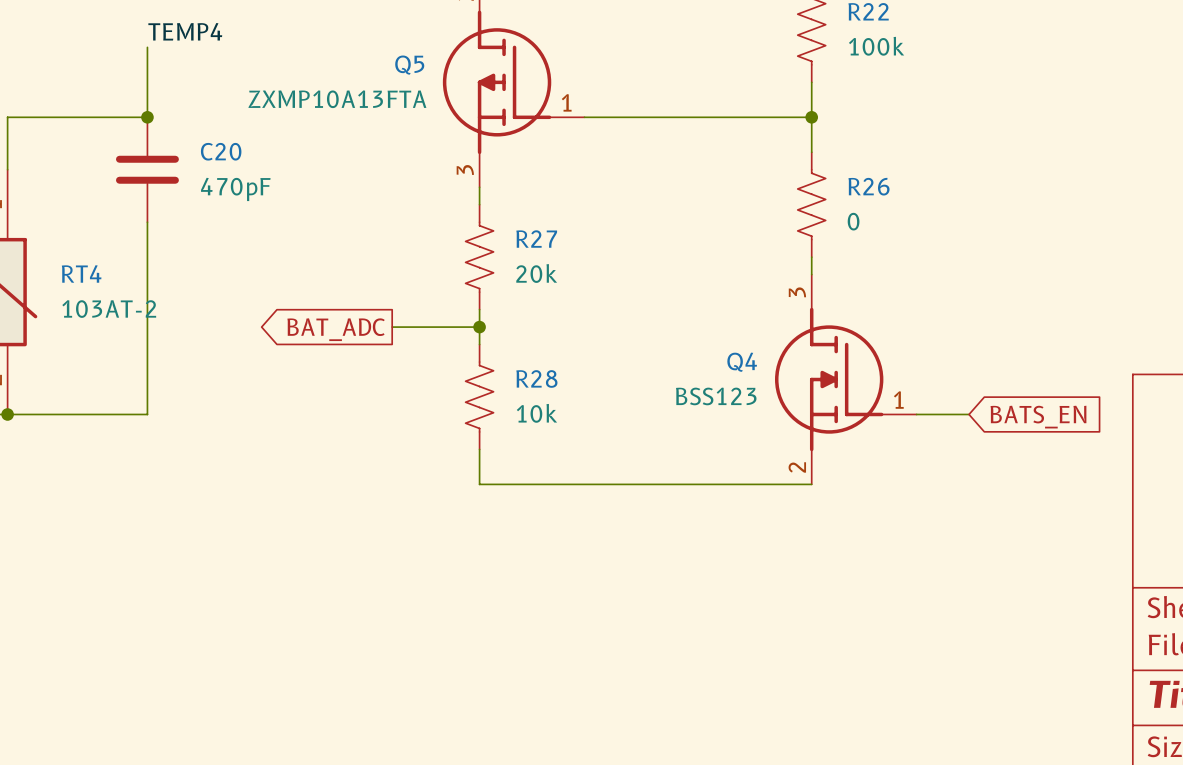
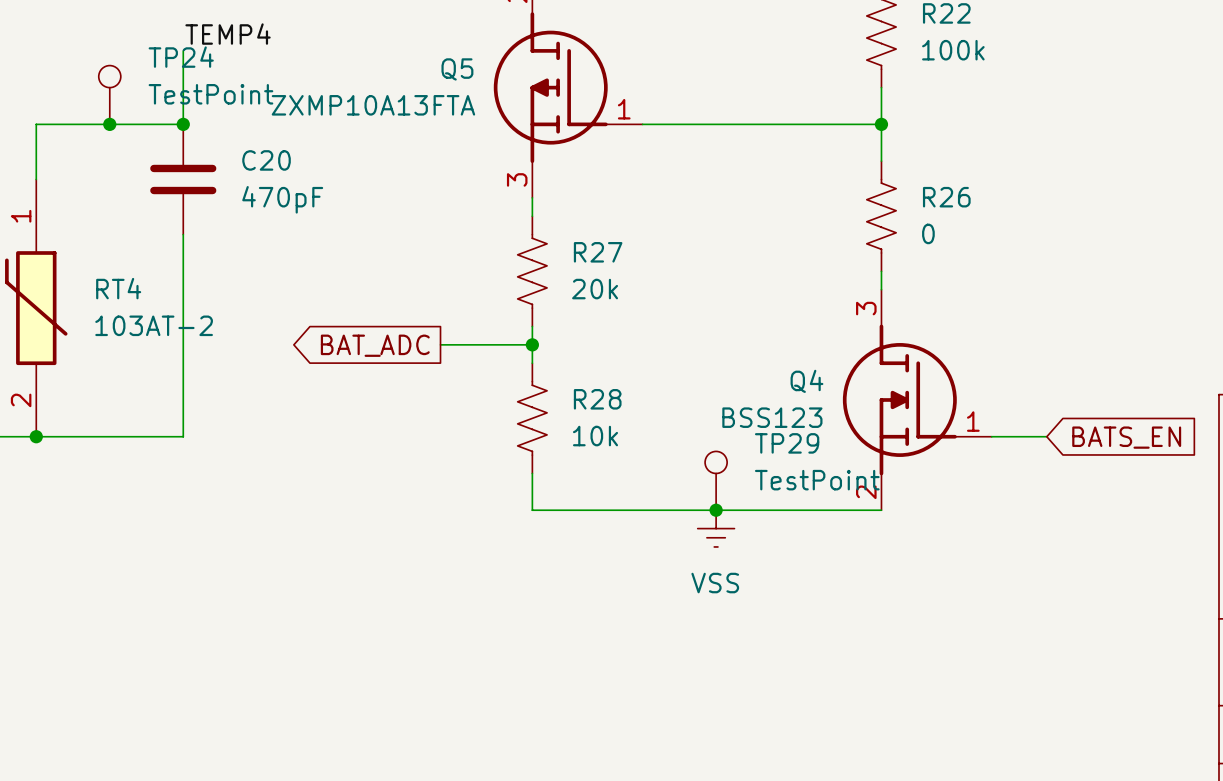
TP24: none -> TestPoint (109, 94)
junction: none -> (109, 124)
TP29: none -> TestPoint (716, 480)
junction: none -> (716, 510)
power symbol: none -> VSS (716, 528)

